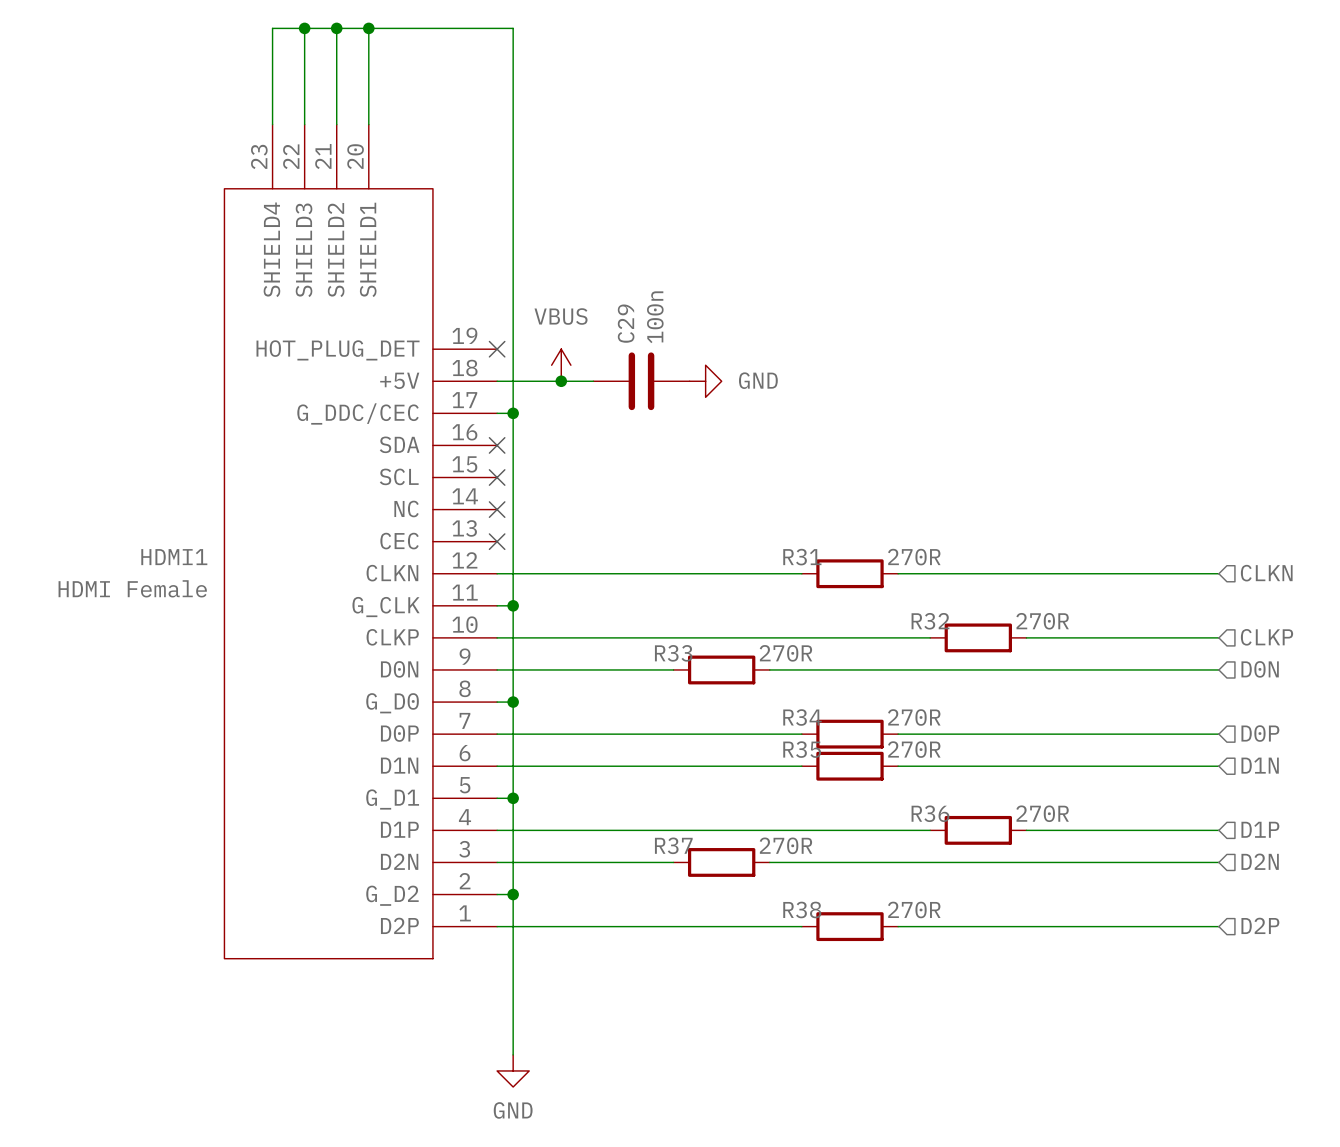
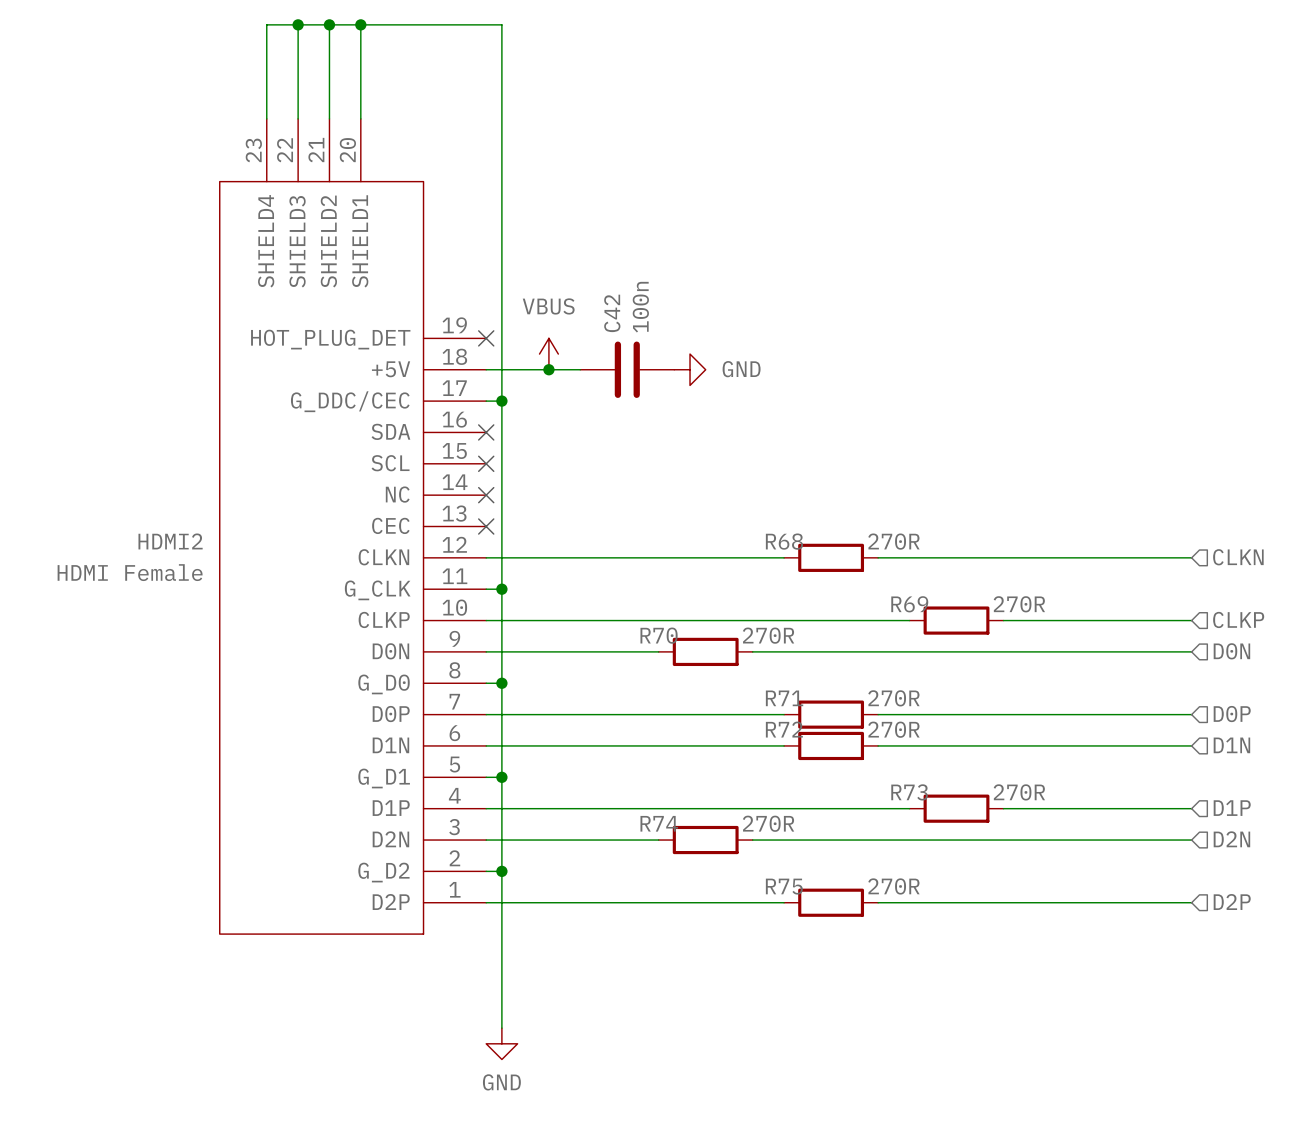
C29 name: C29 (626, 323) -> C42 (612, 313)
HDMI1 name: HDMI1 (174, 557) -> HDMI2 (170, 541)
R31 name: R31 (802, 557) -> R68 (784, 541)
R32 name: R32 (930, 621) -> R69 (909, 604)
R33 name: R33 (673, 653) -> R70 (659, 635)
R34 name: R34 (802, 717) -> R71 (784, 698)
R35 name: R35 (802, 749) -> R72 (784, 729)
R36 name: R36 (930, 813) -> R73 (909, 792)
R37 name: R37 (673, 845) -> R74 (659, 823)
R38 name: R38 (802, 909) -> R75 (784, 886)

